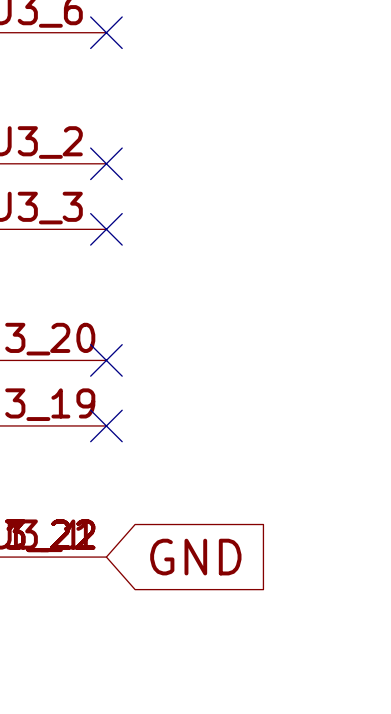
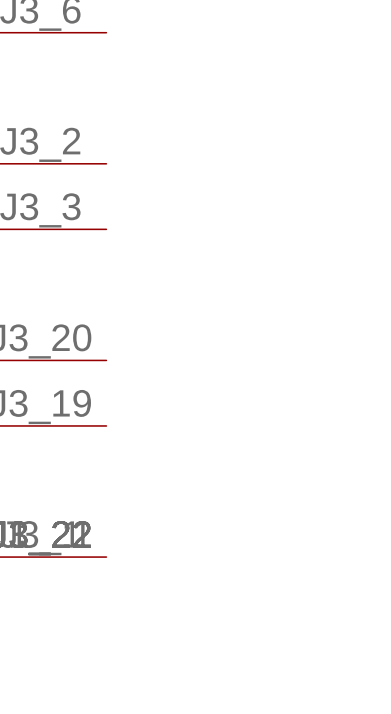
no-connect mark: (106, 32) -> none
no-connect mark: (106, 163) -> none
no-connect mark: (106, 229) -> none
no-connect mark: (106, 360) -> none
no-connect mark: (106, 425) -> none
global label: GND (195, 557) -> none

